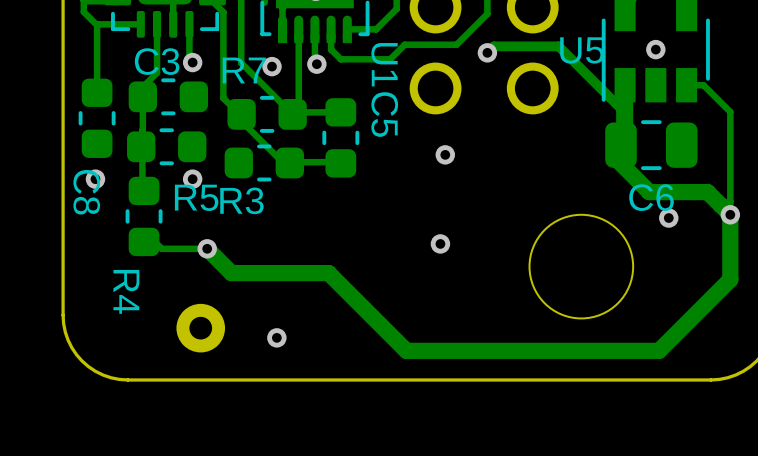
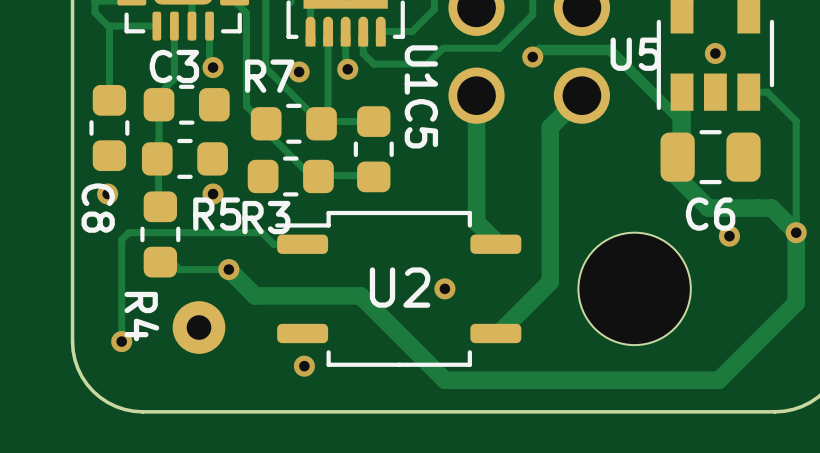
track: none -> (476, 95) (476, 222) (497, 243)
track: none -> (581, 95) (550, 127) (550, 281) (497, 334)
via: (445, 154) -> none
track: none -> (302, 244) (273, 244) (262, 232) (128, 232) (121, 239) (121, 341)
via position: (440, 243) -> (444, 288)
U2: none -> (398, 288)
via: none -> (121, 341)
part position: (200, 328) -> (198, 327)

